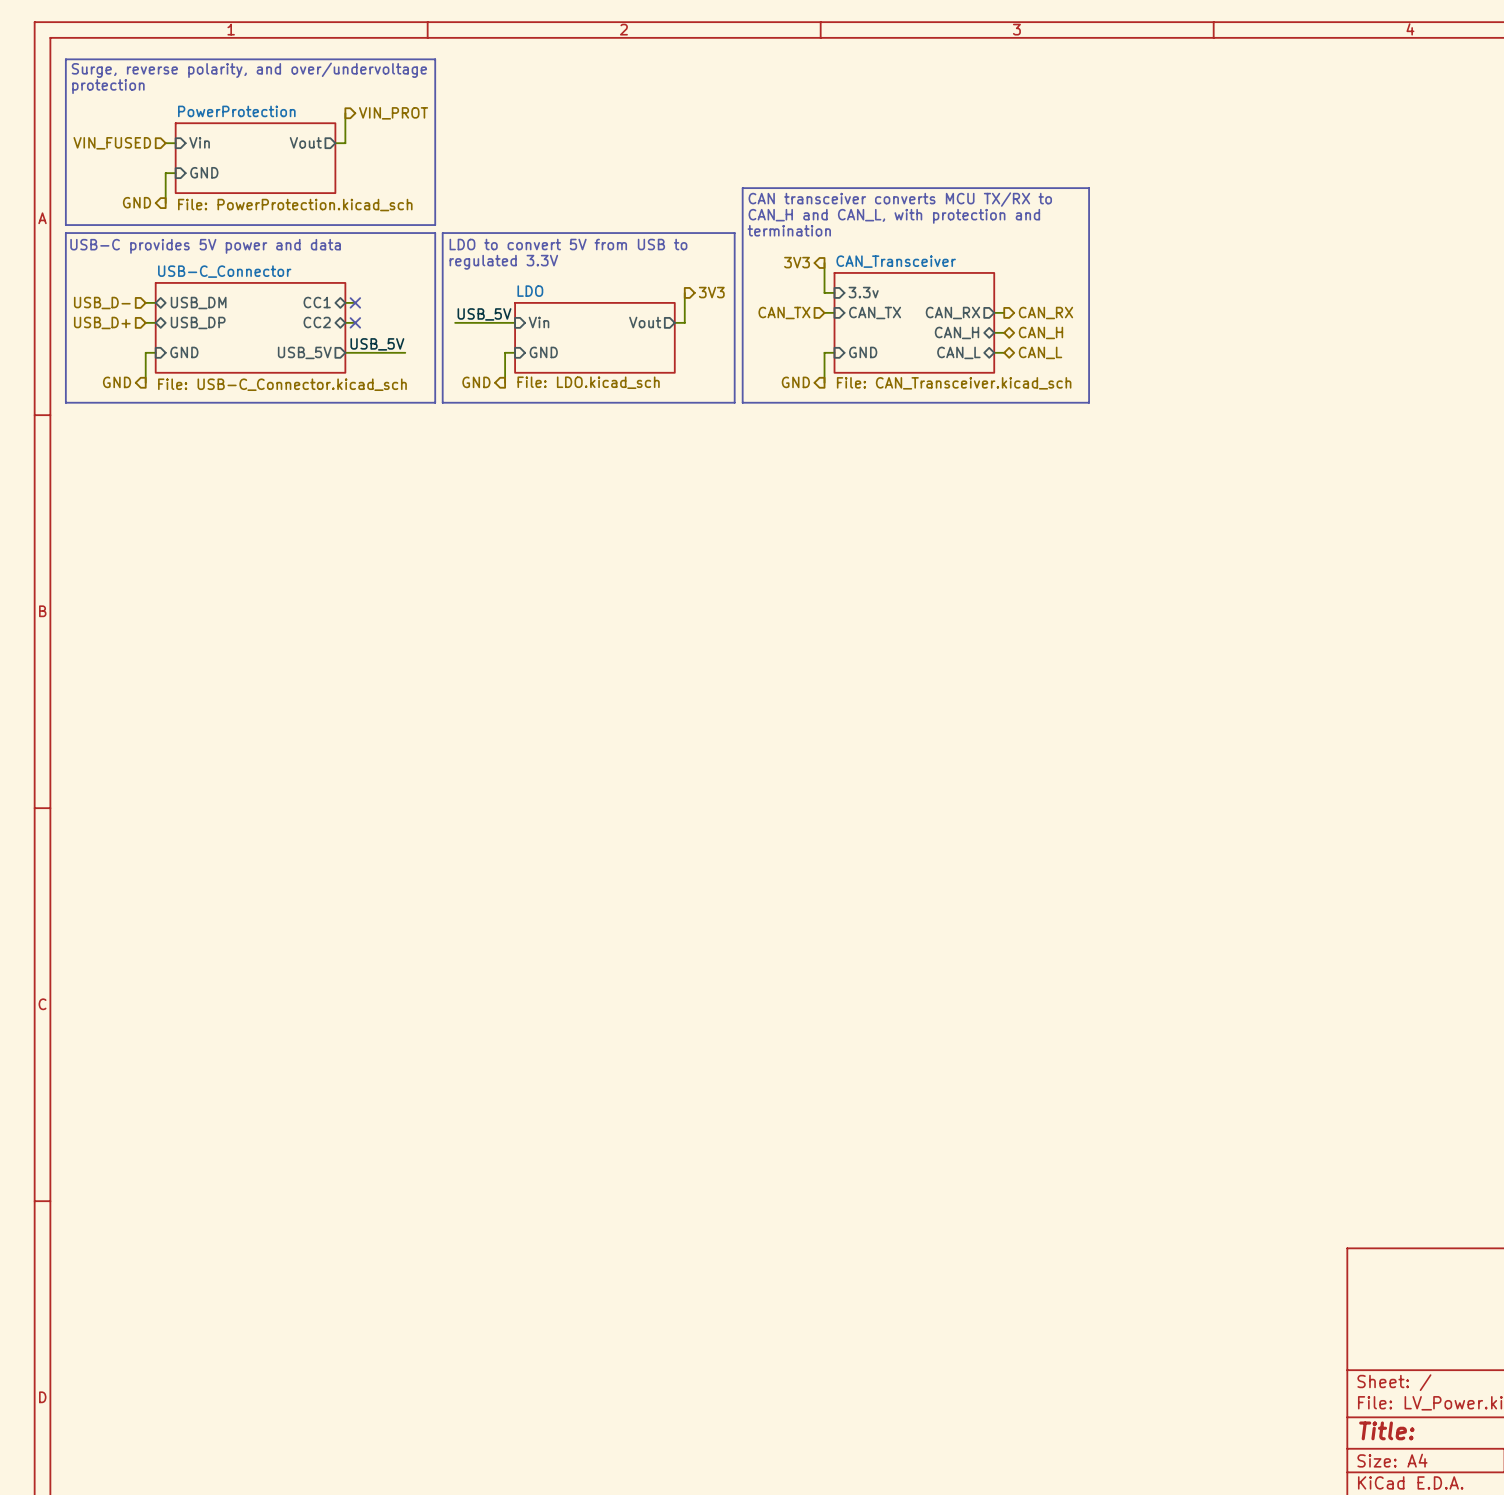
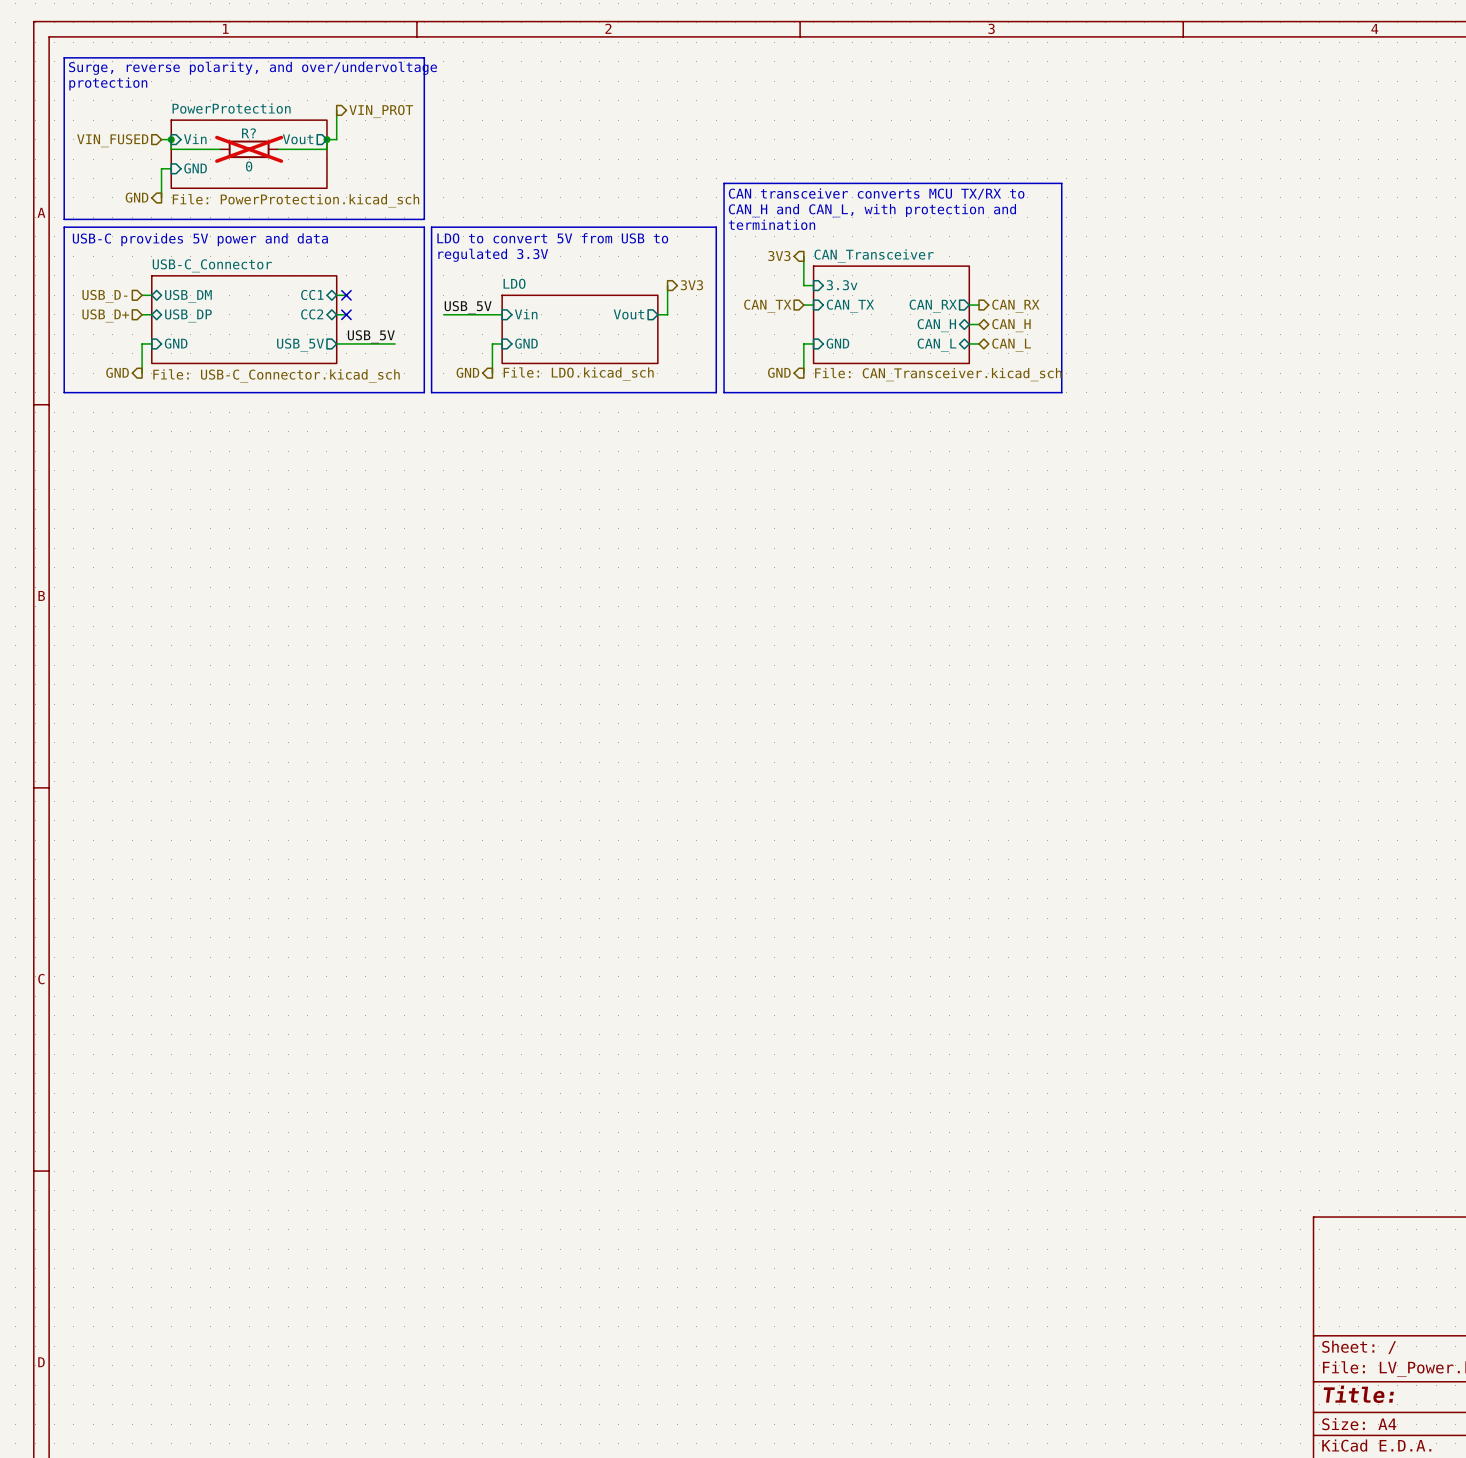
wire: none -> (171, 139) (171, 149) (219, 149)
junction: none -> (171, 139)
wire: none -> (326, 139) (326, 149) (278, 149)
junction: none -> (326, 139)
R?: none -> 0 (249, 149)

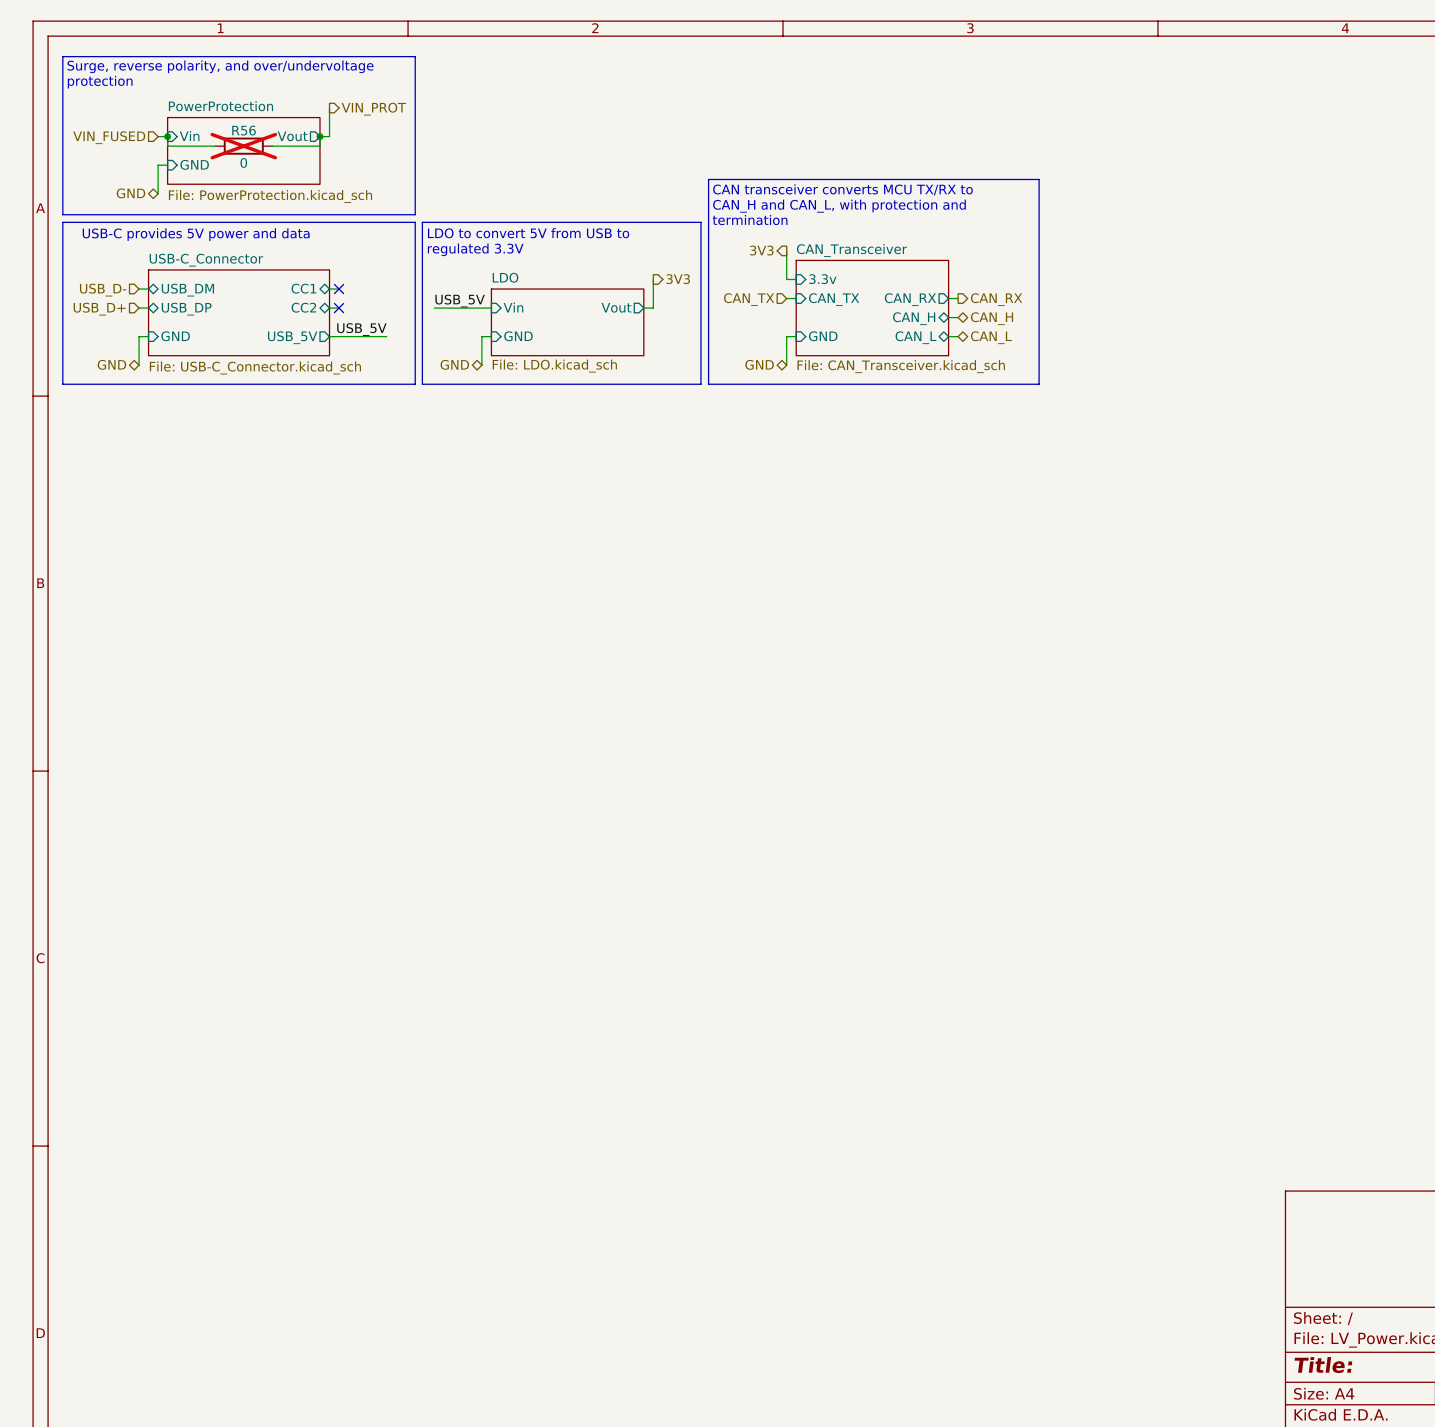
R? name: R? (248, 133) -> R56 (244, 130)
hierarchical label shape: output (137, 197) -> bidirectional (130, 193)
hierarchical label shape: output (117, 372) -> bidirectional (111, 364)
hierarchical label shape: output (467, 372) -> bidirectional (454, 364)
hierarchical label shape: output (779, 372) -> bidirectional (759, 364)

